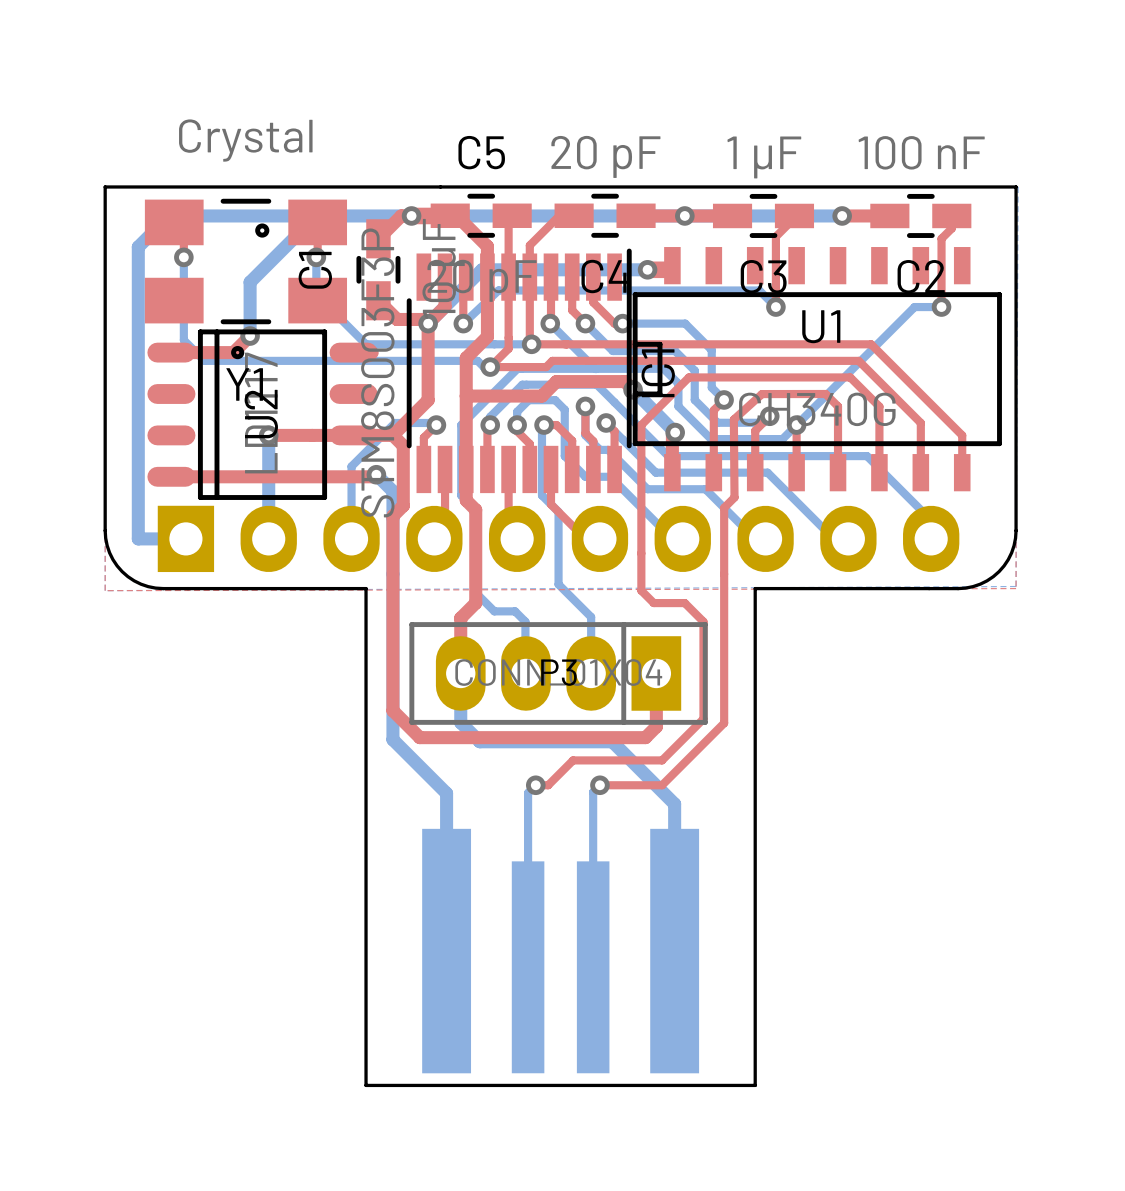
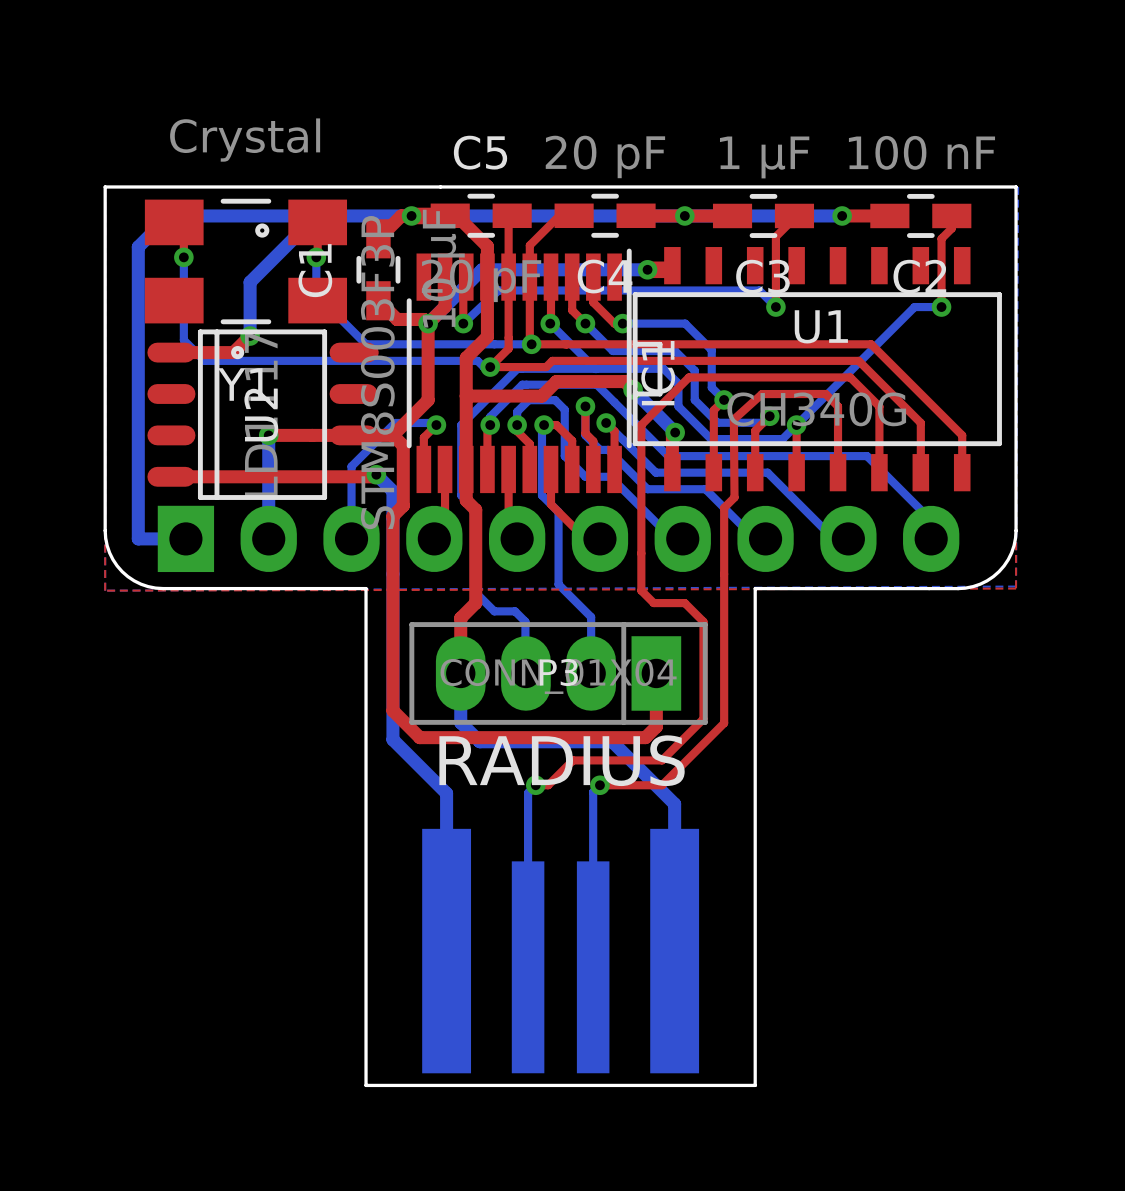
text: none -> RADIUS (562, 760)

